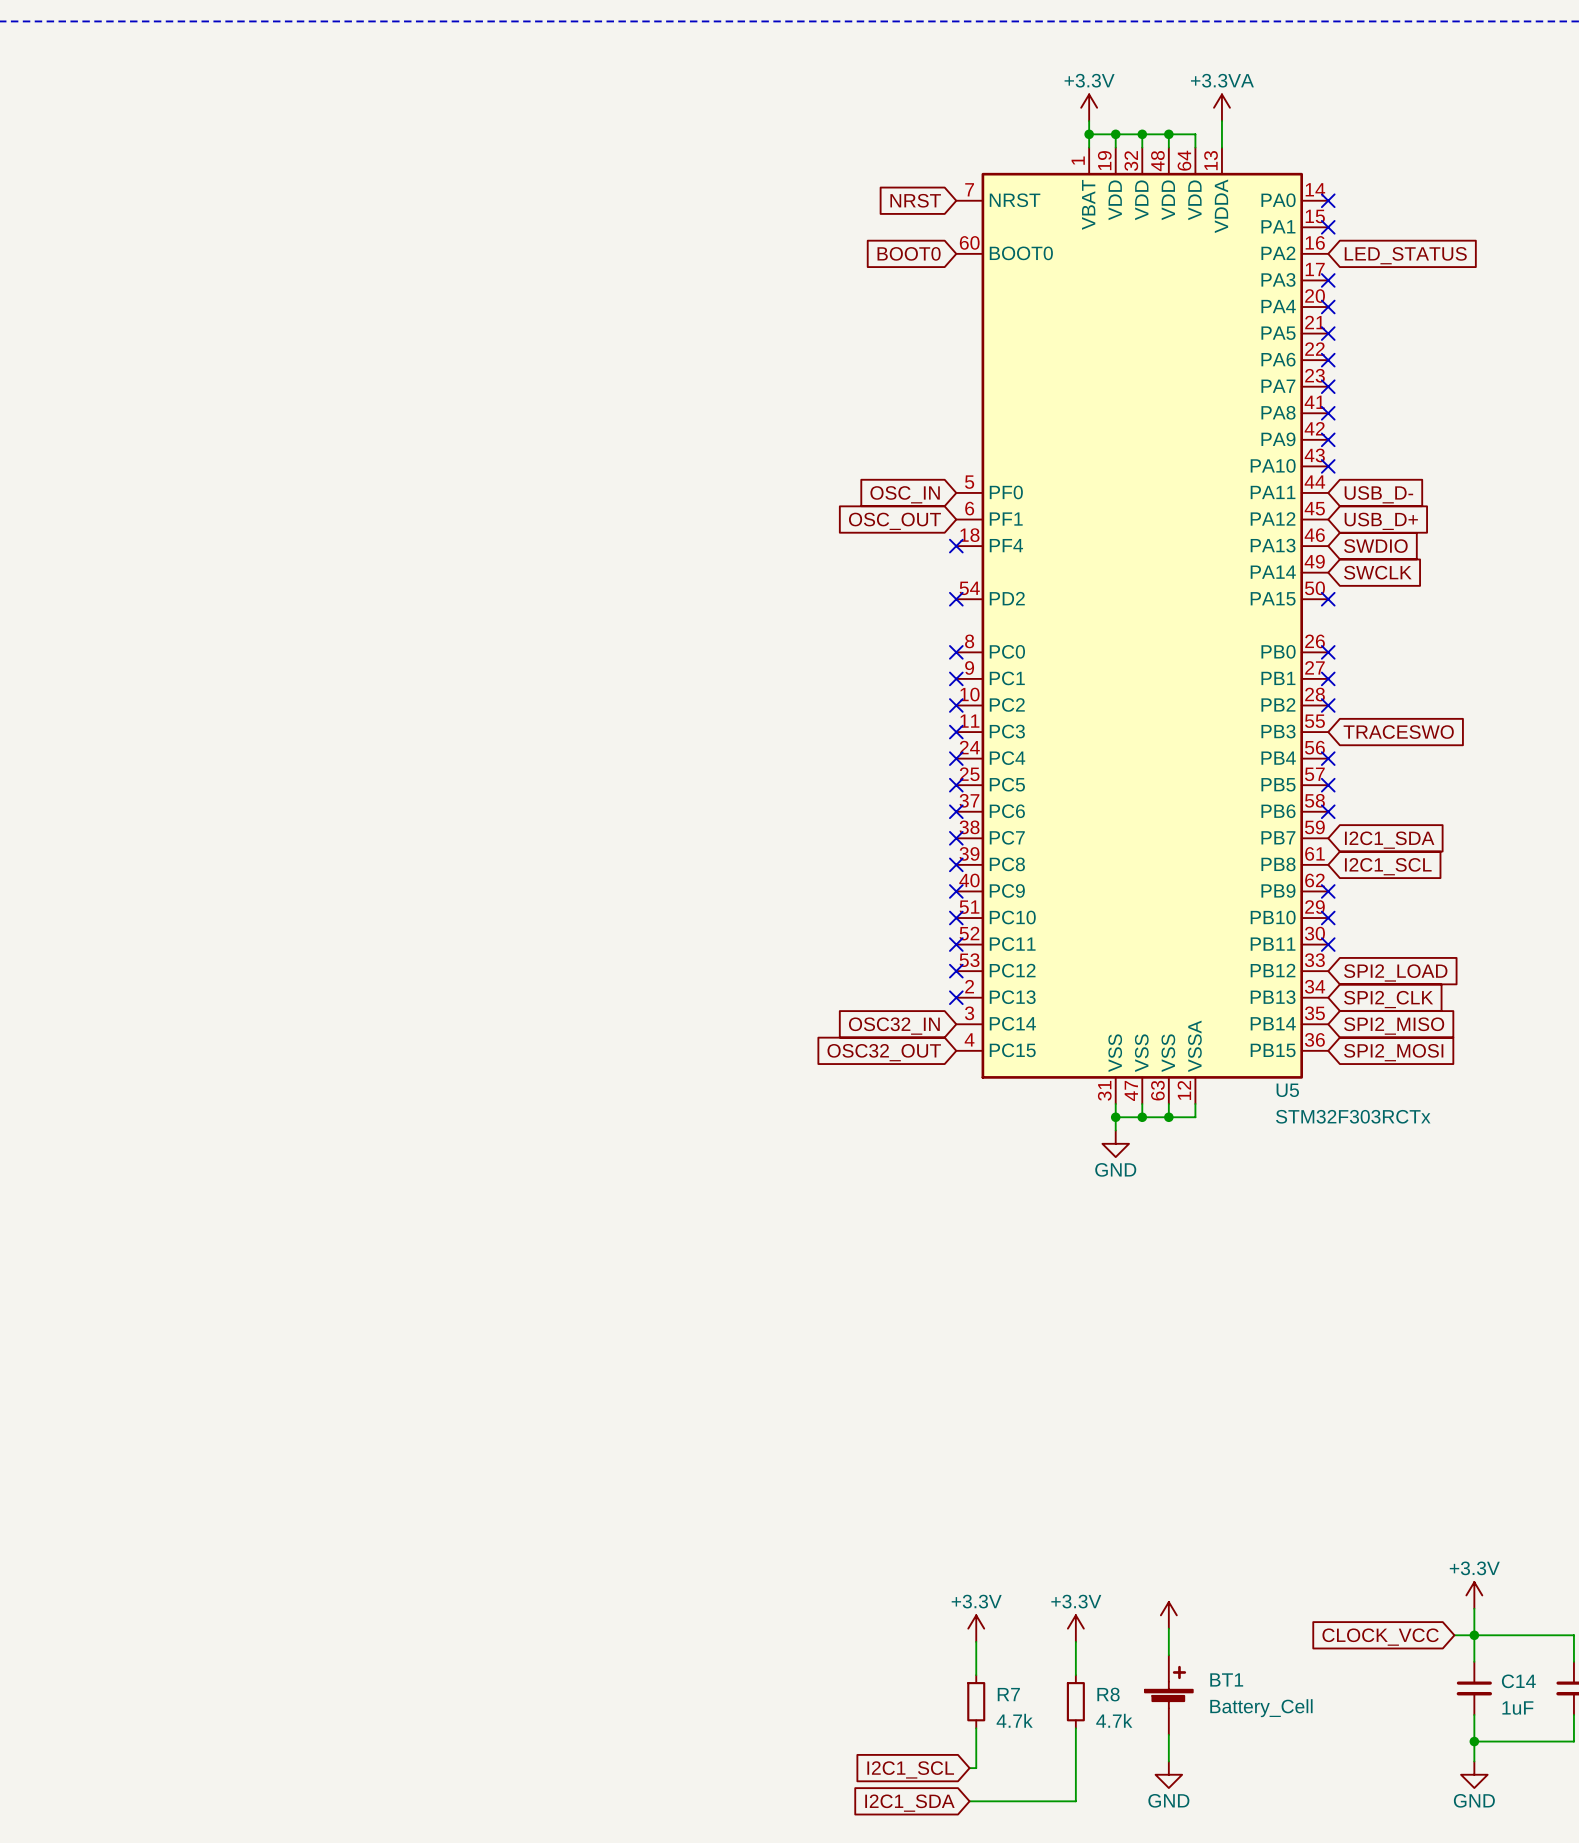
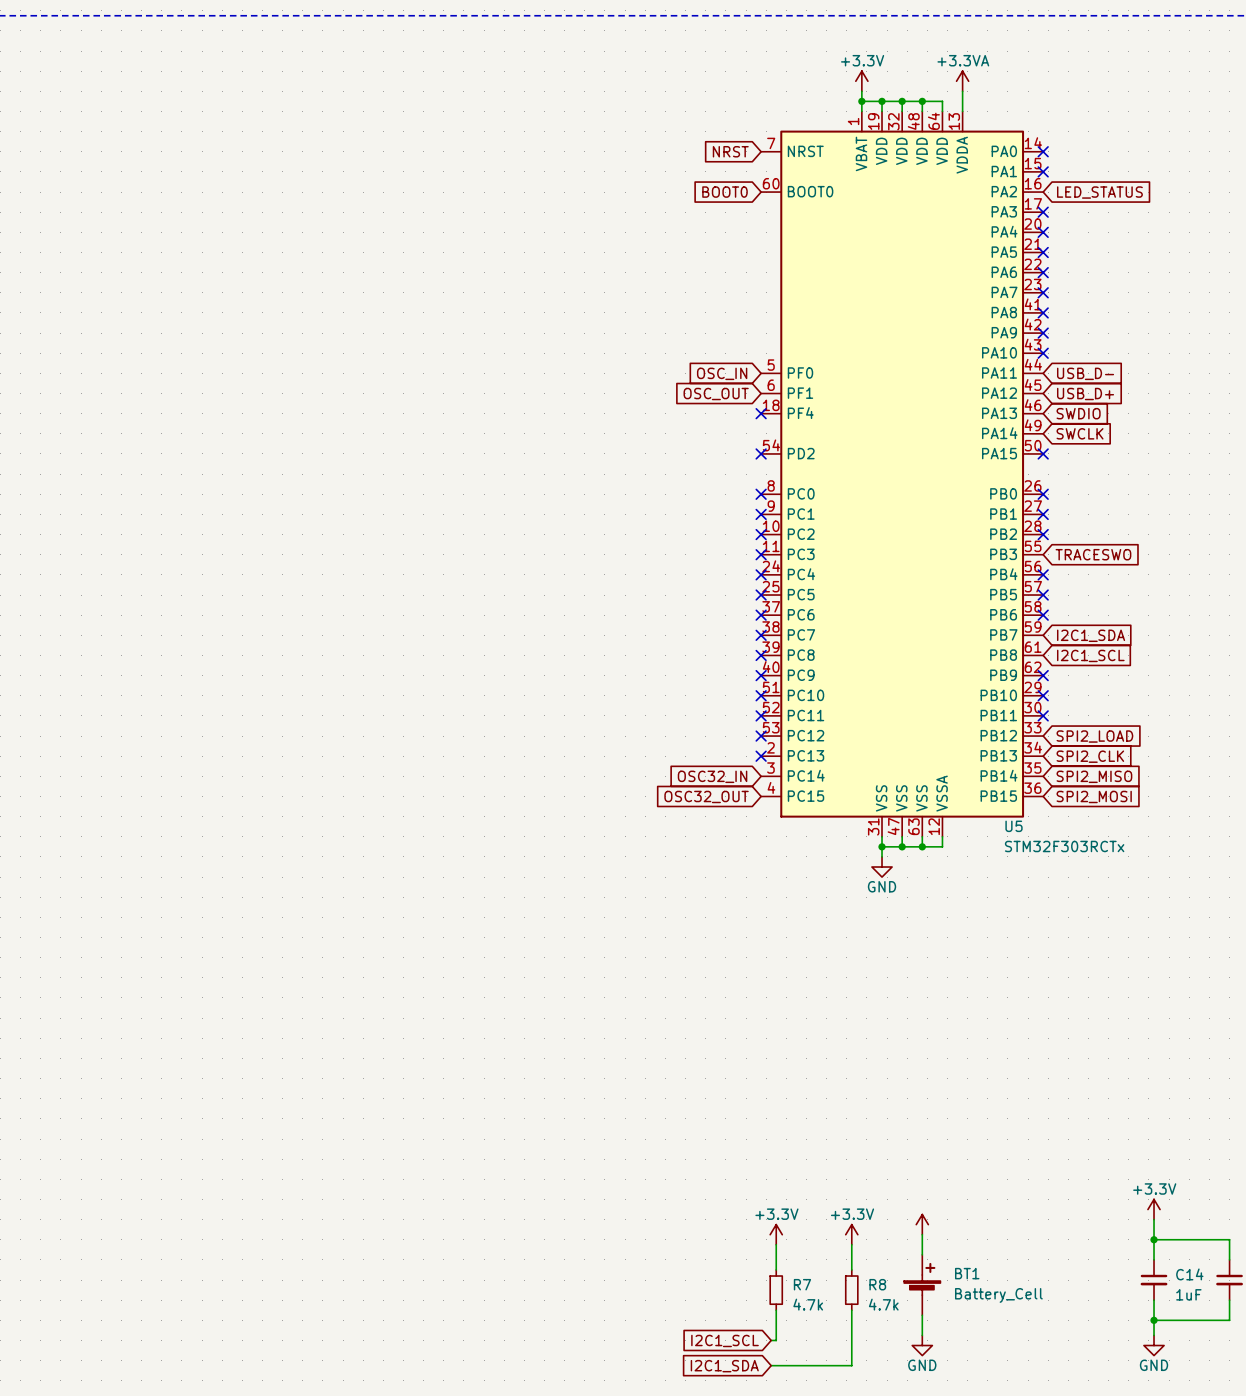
wire: (1454, 1635) (1474, 1635) -> none
global label: CLOCK_VCC (1380, 1637) -> none

